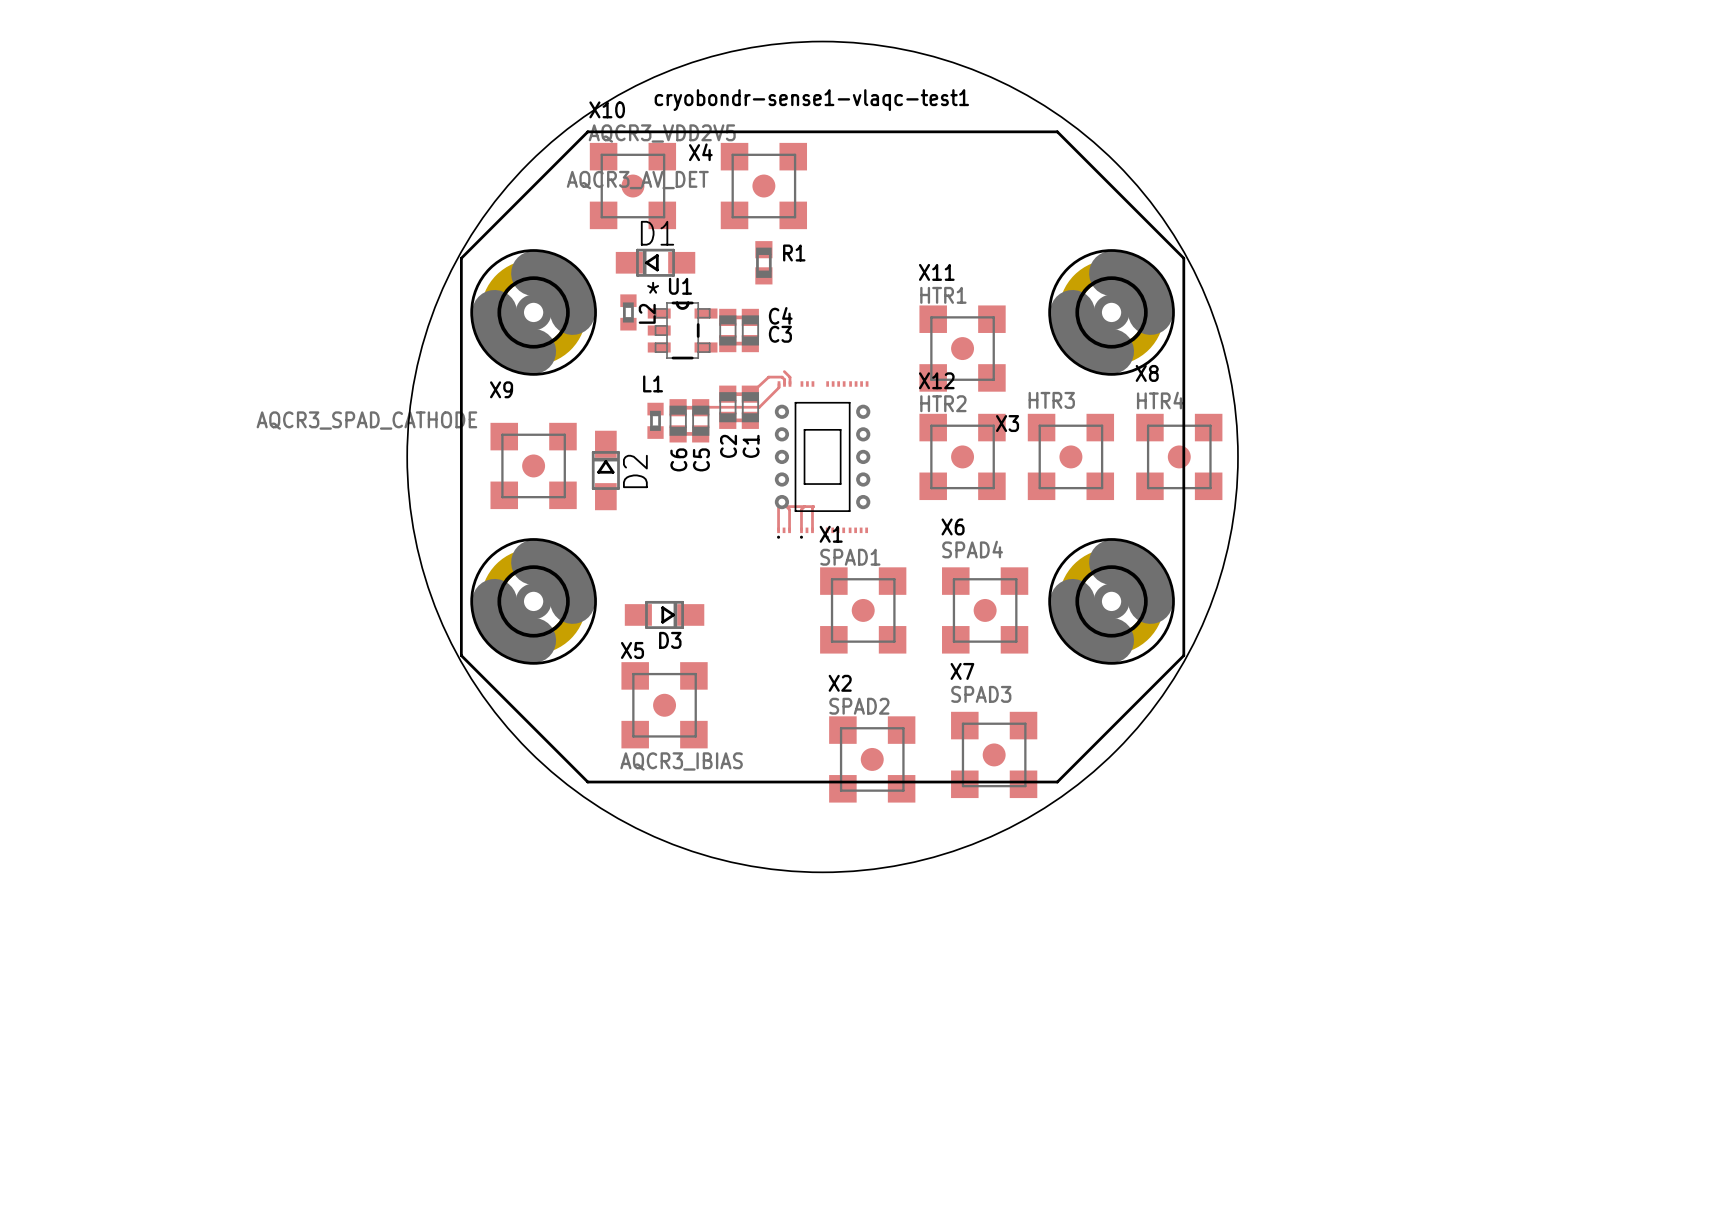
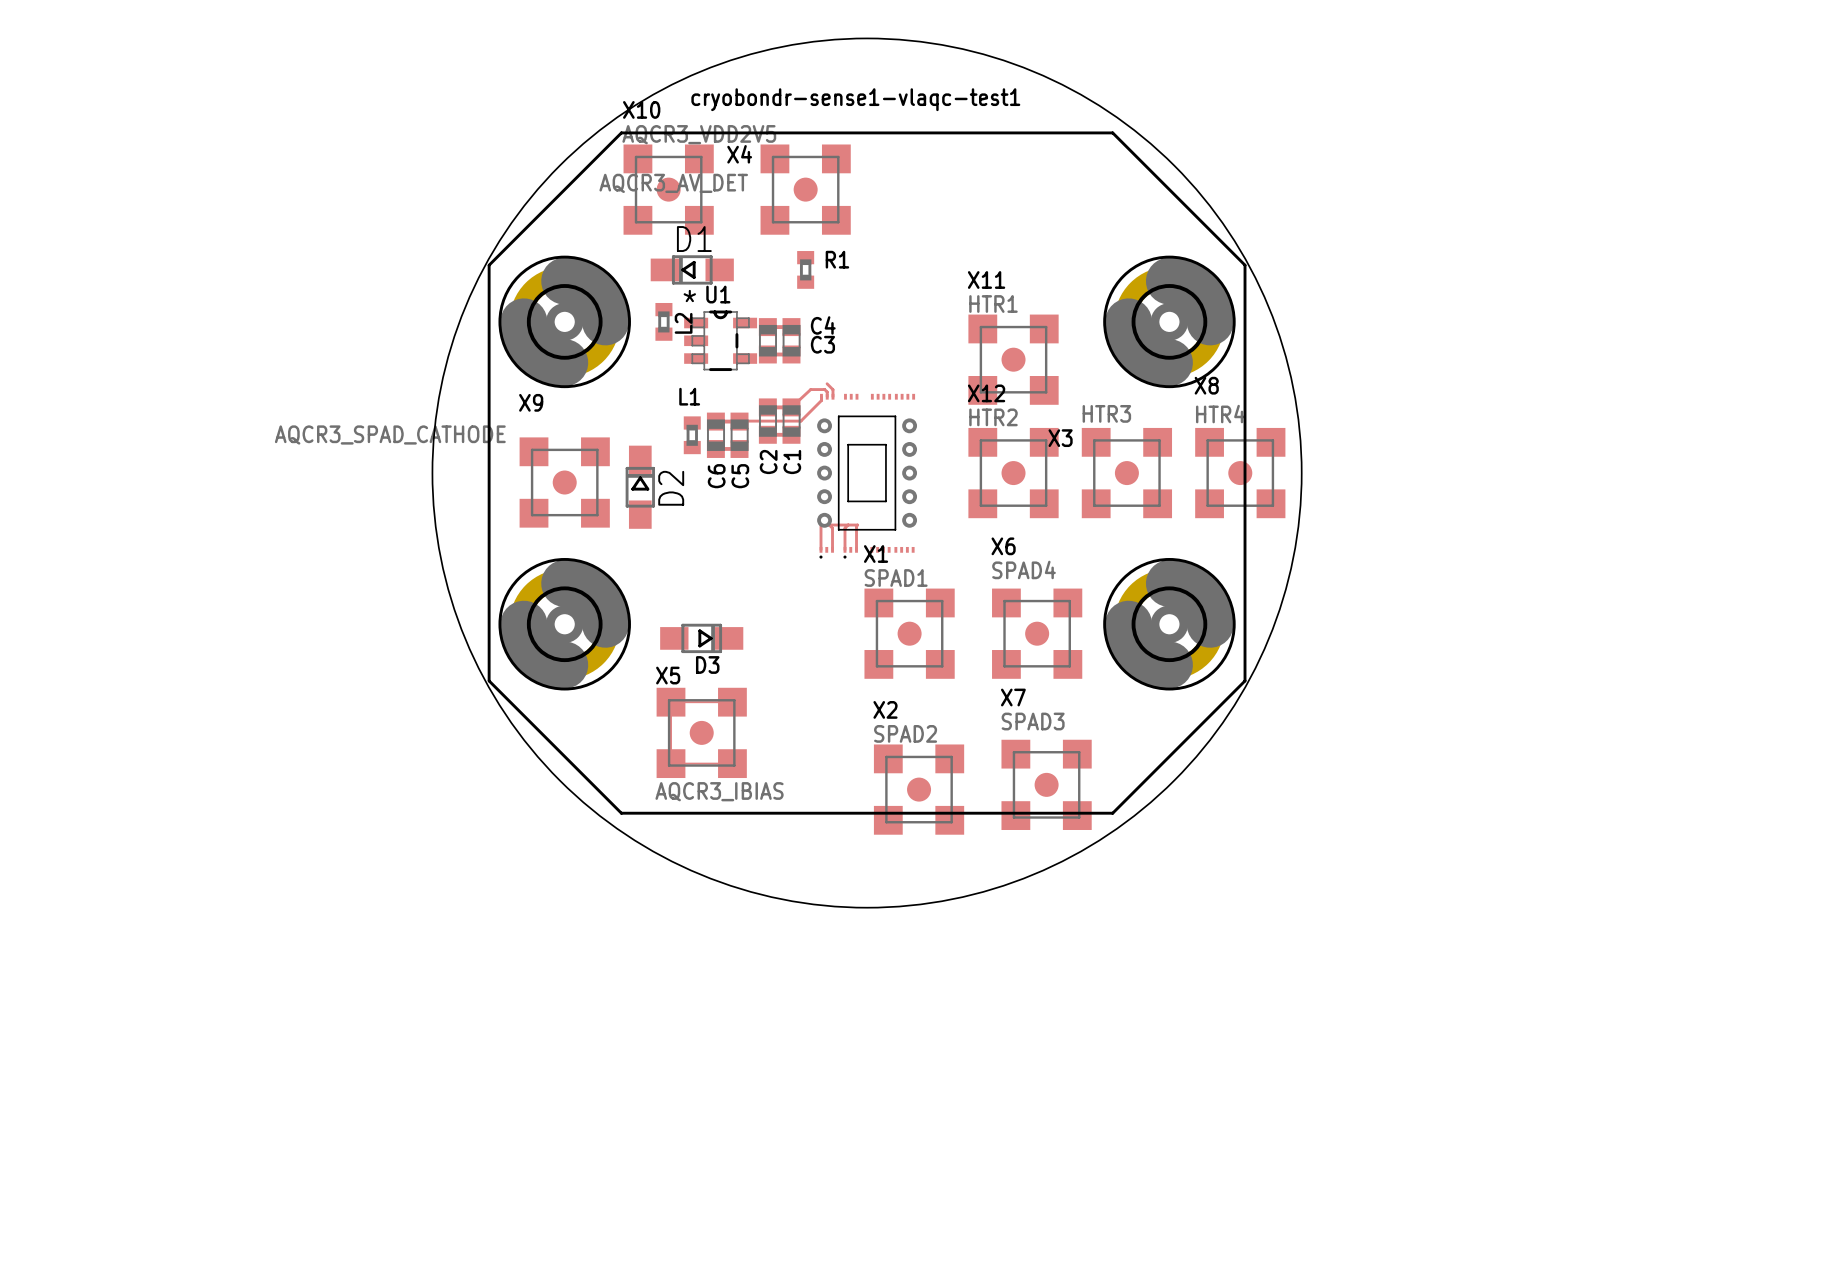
R1 footprint: [755, 241, 773, 285] -> [797, 251, 815, 289]
track: none -> (732, 702) (671, 702) (671, 763) (732, 763)

